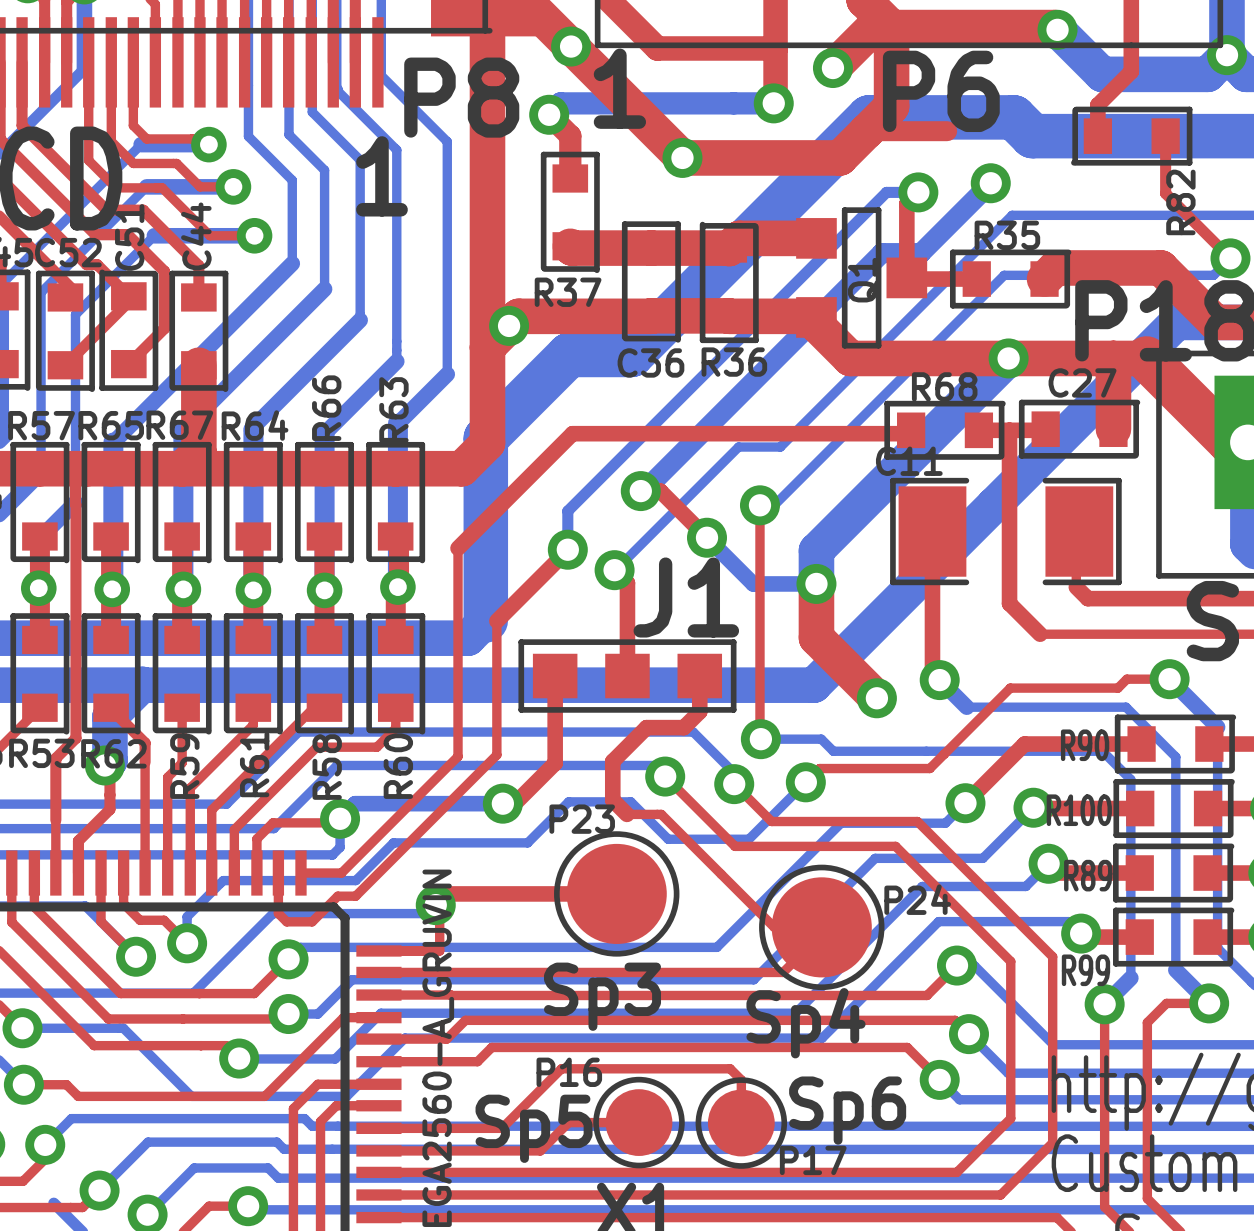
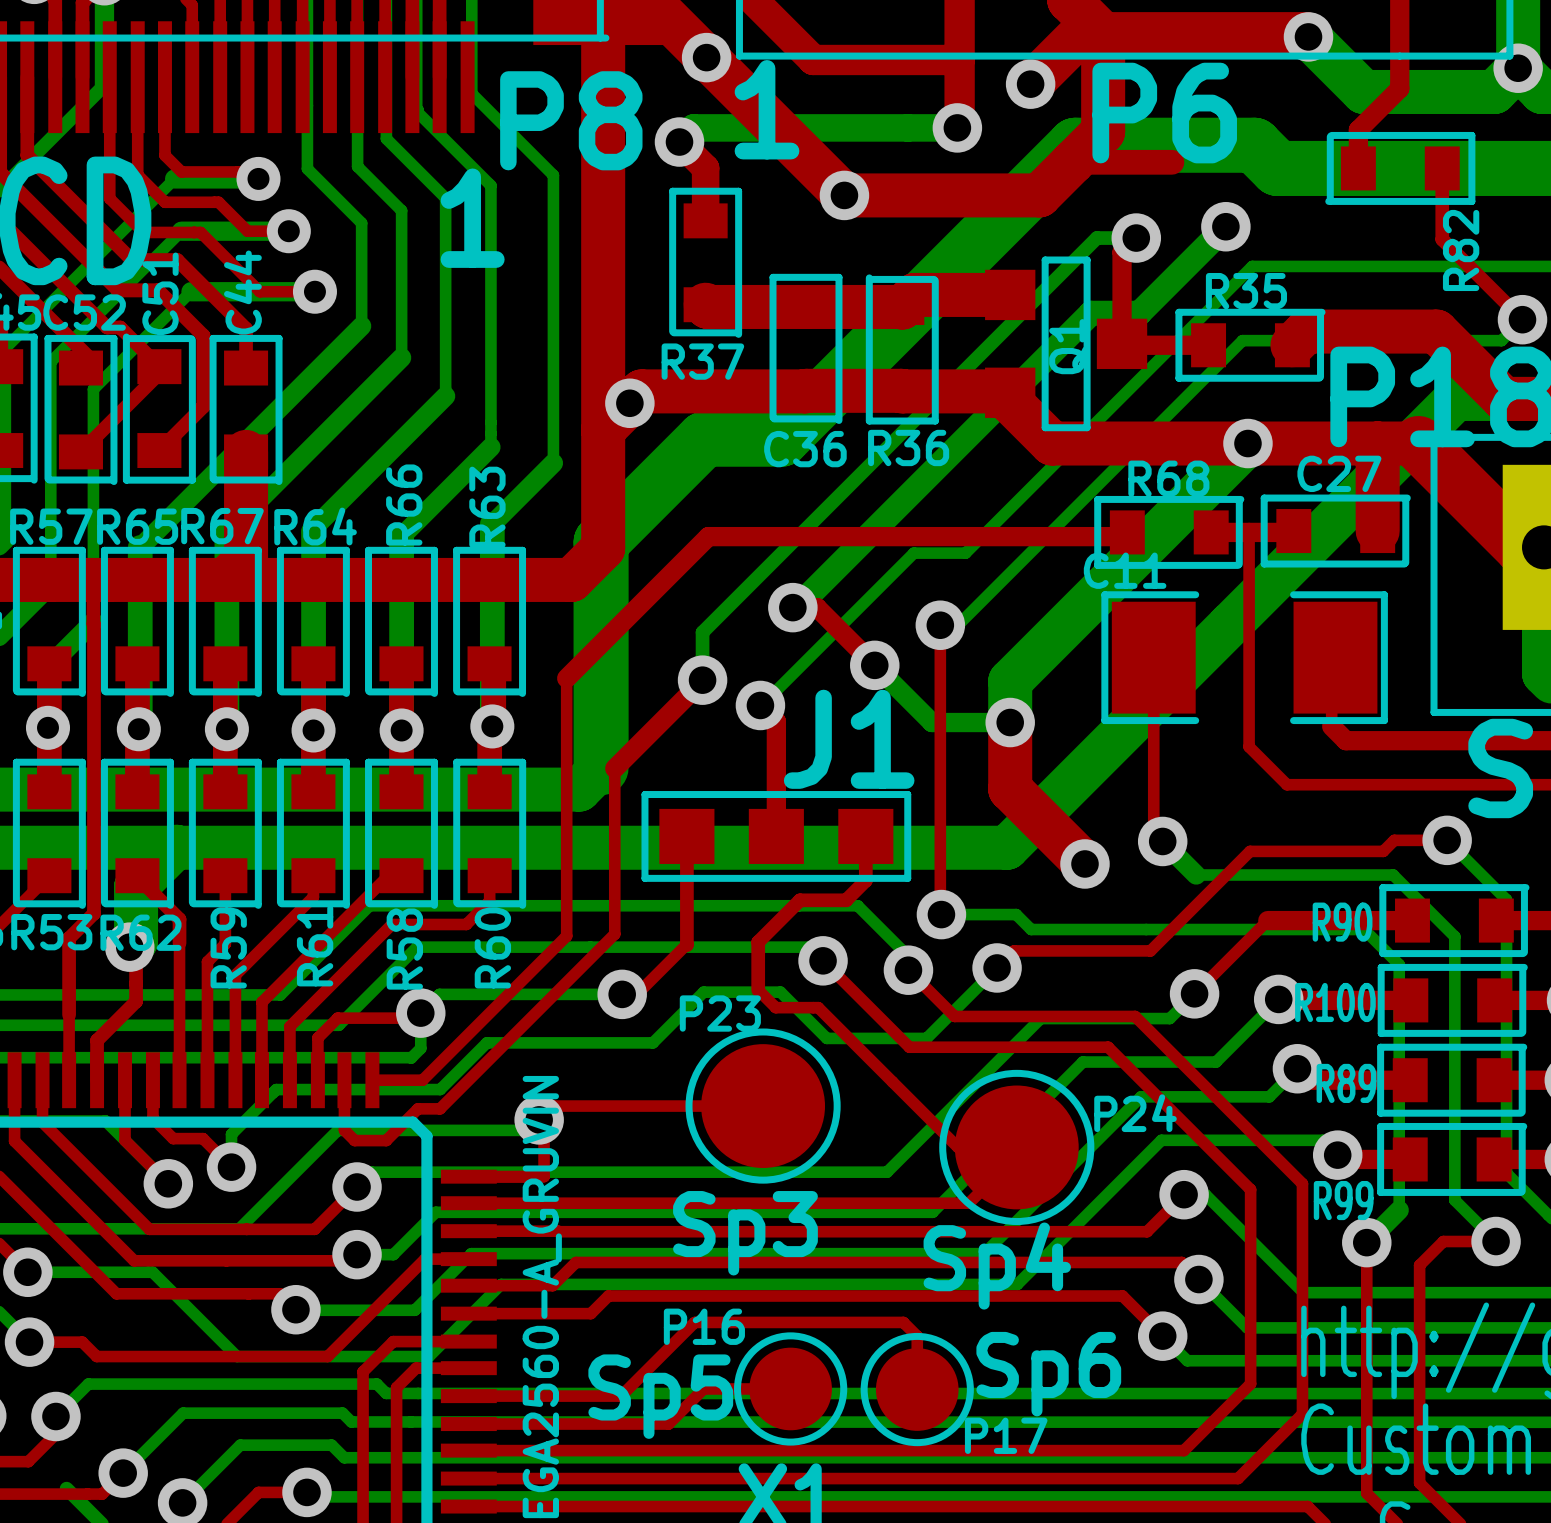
top track width: thick (1009, 430) (1009, 603) (1040, 634) -> thin (1249, 532) (1249, 746) (1286, 784)
top track width: thick (932, 531) (932, 672) -> thin (1153, 657) (1153, 832)
top track width: thick (555, 676) (555, 763) (514, 803) (502, 803) -> thin (686, 836) (686, 944) (636, 994) (622, 994)
top track width: thick (699, 676) (699, 711) (683, 727) (646, 727) (612, 761) (612, 800) (627, 814) -> thin (865, 836) (865, 880) (846, 900) (799, 900) (758, 942) (758, 990) (775, 1007)
bottom track width: thick (1169, 679) (1217, 727) -> thin (1447, 840) (1506, 899)
top track width: thick (1024, 744) (965, 803) -> thin (1267, 920) (1194, 993)
bottom track width: thick (502, 803) (355, 803) (340, 818) -> thin (622, 994) (439, 994) (420, 1013)
top track width: thick (616, 893) (446, 893) (435, 905) -> thin (763, 1106) (553, 1106) (539, 1119)
bottom track width: thick (1175, 970) (1209, 1003) -> thin (1454, 1200) (1496, 1241)

